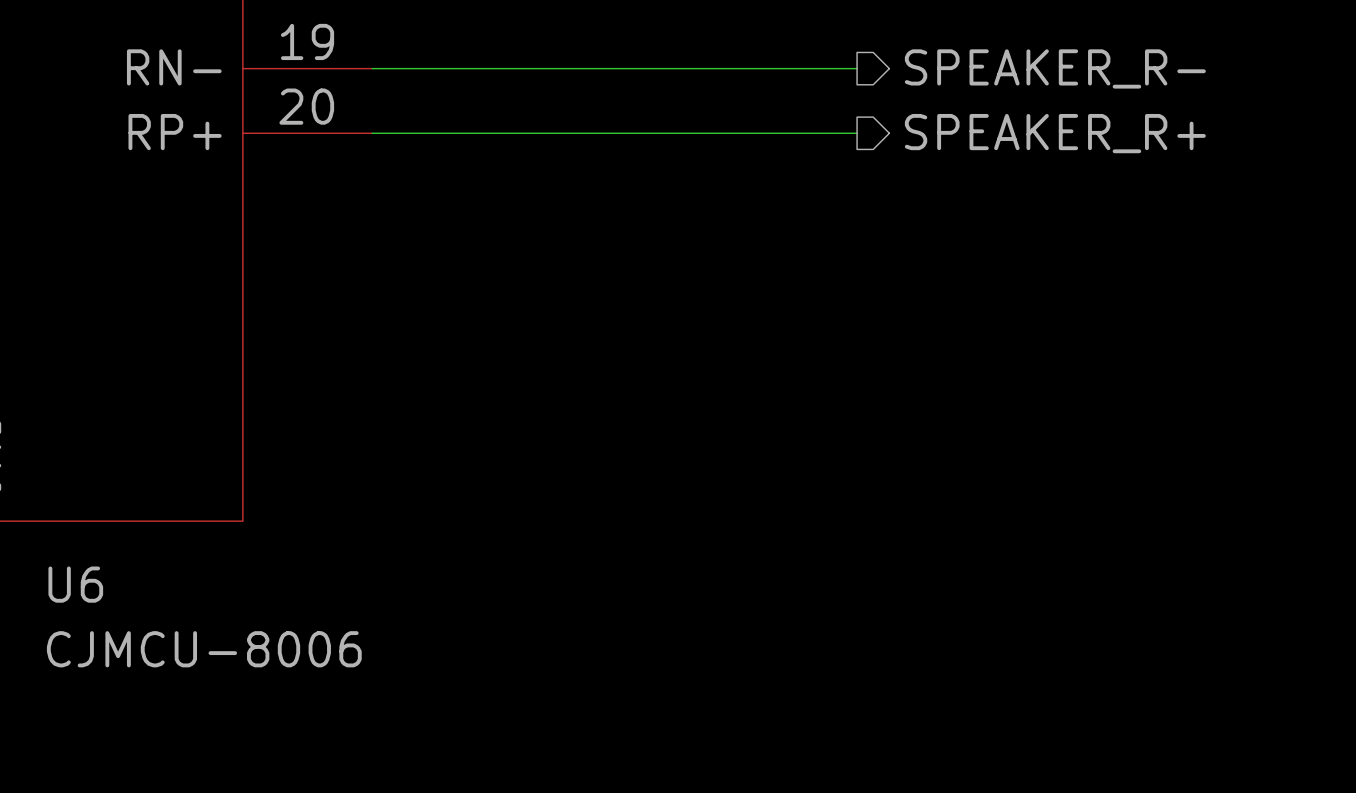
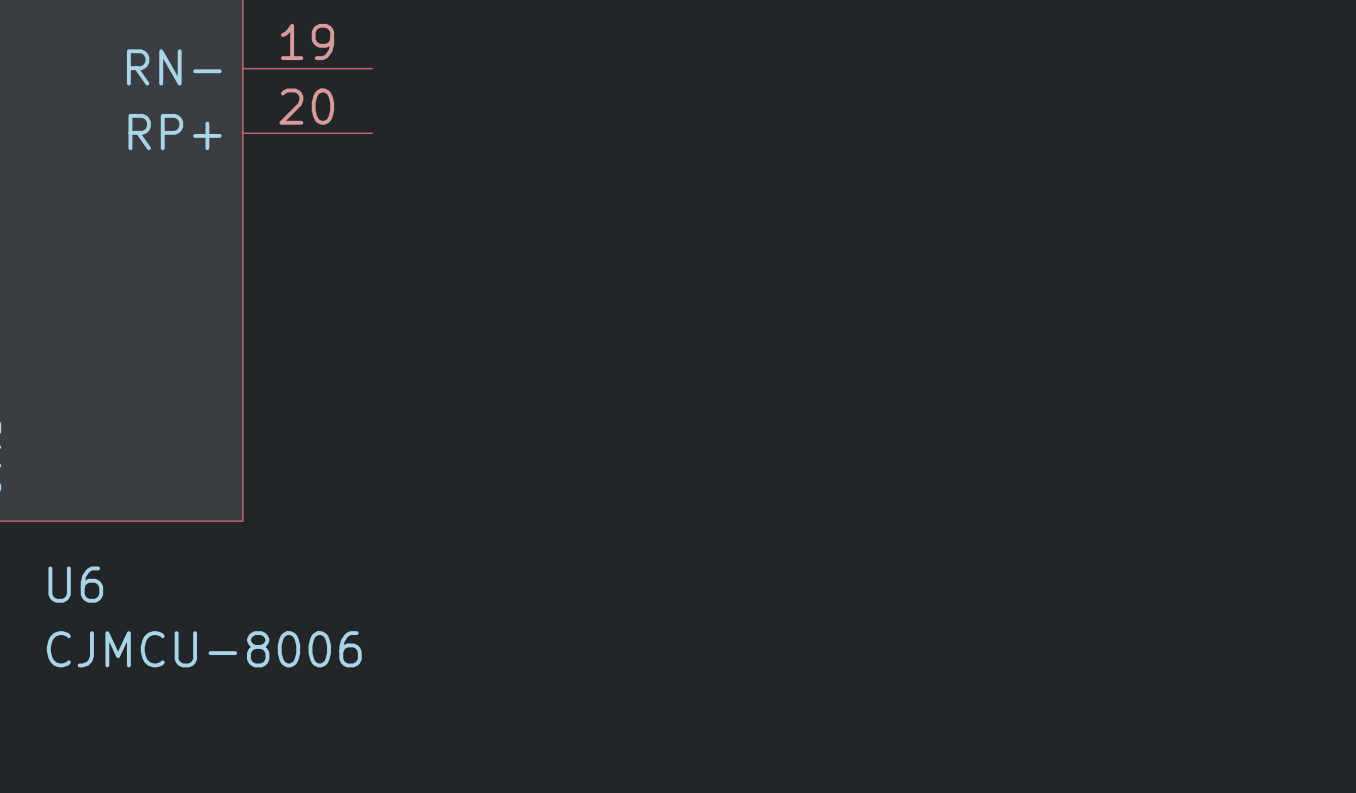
wire: (372, 68) (857, 68) -> none
hierarchical label: SPEAKER_R- (1055, 68) -> none
wire: (372, 133) (857, 133) -> none
hierarchical label: SPEAKER_R+ (1055, 133) -> none

